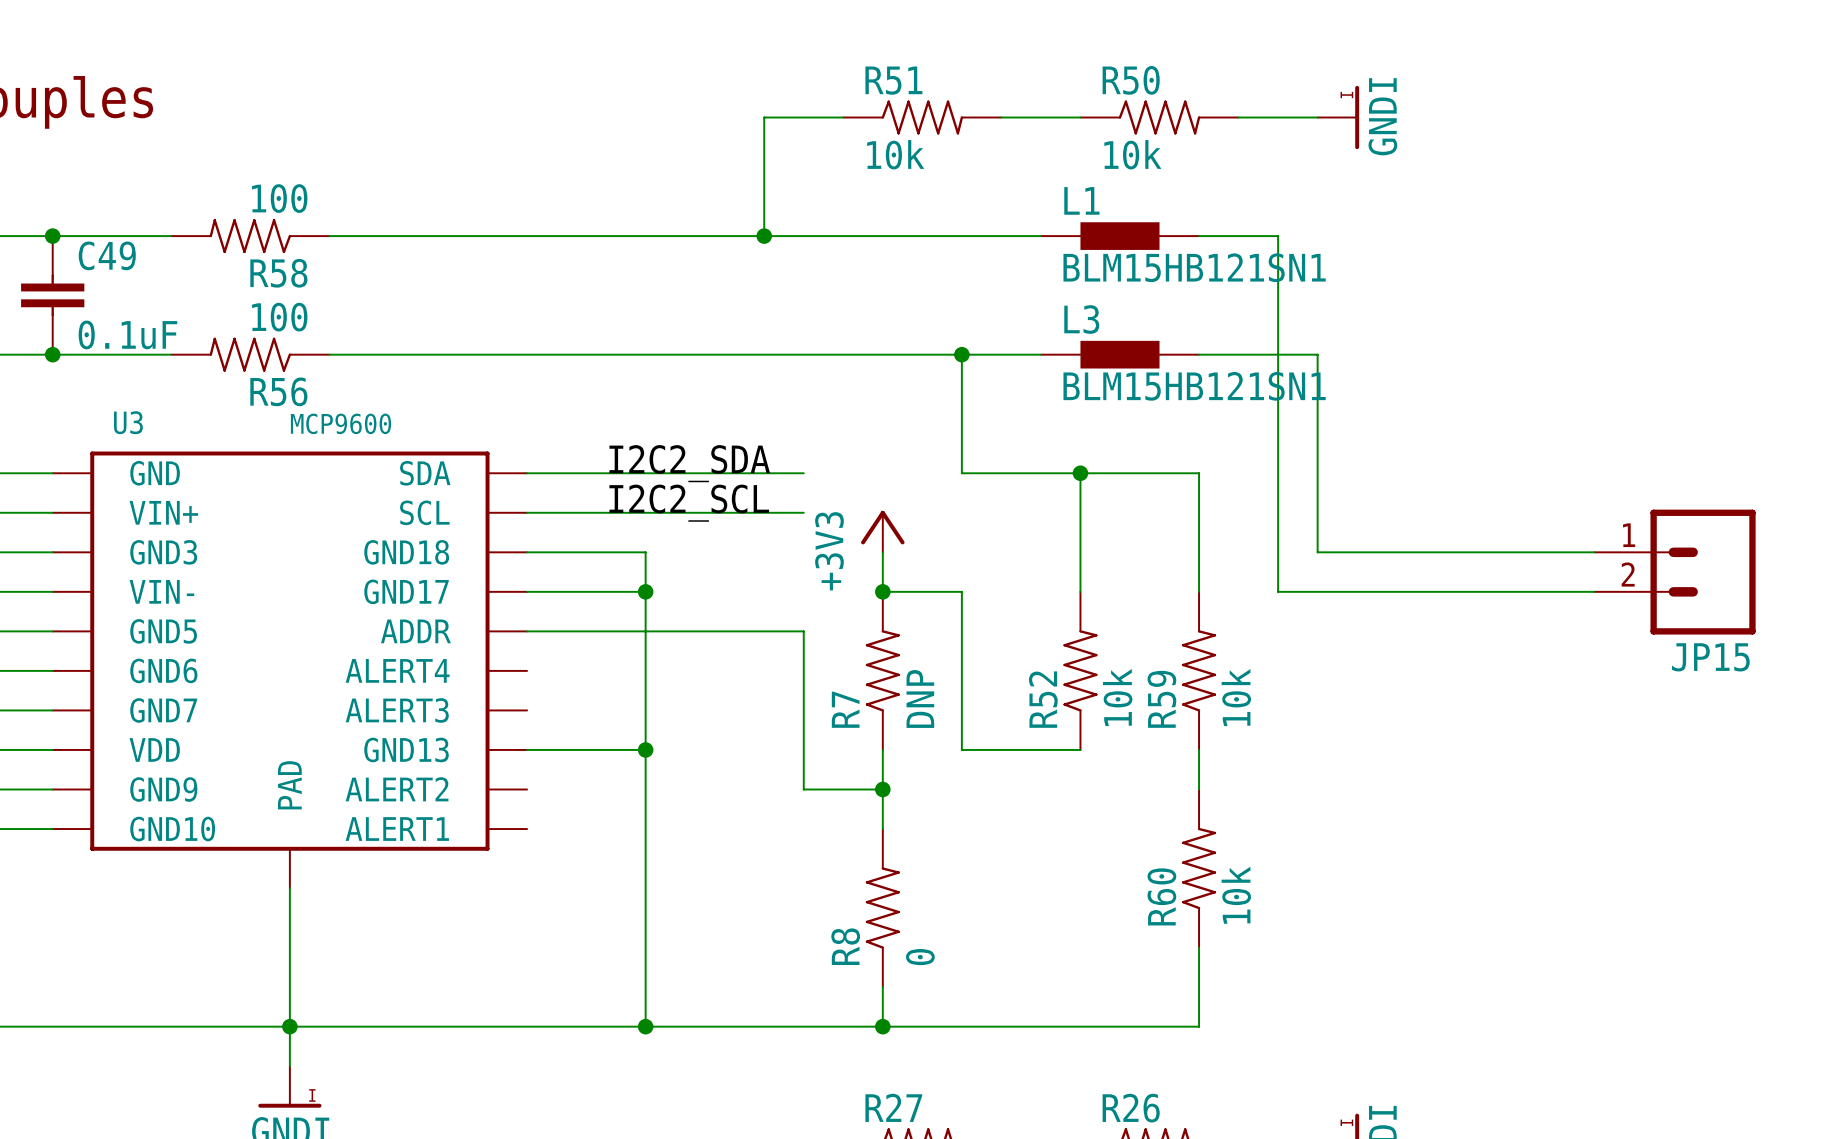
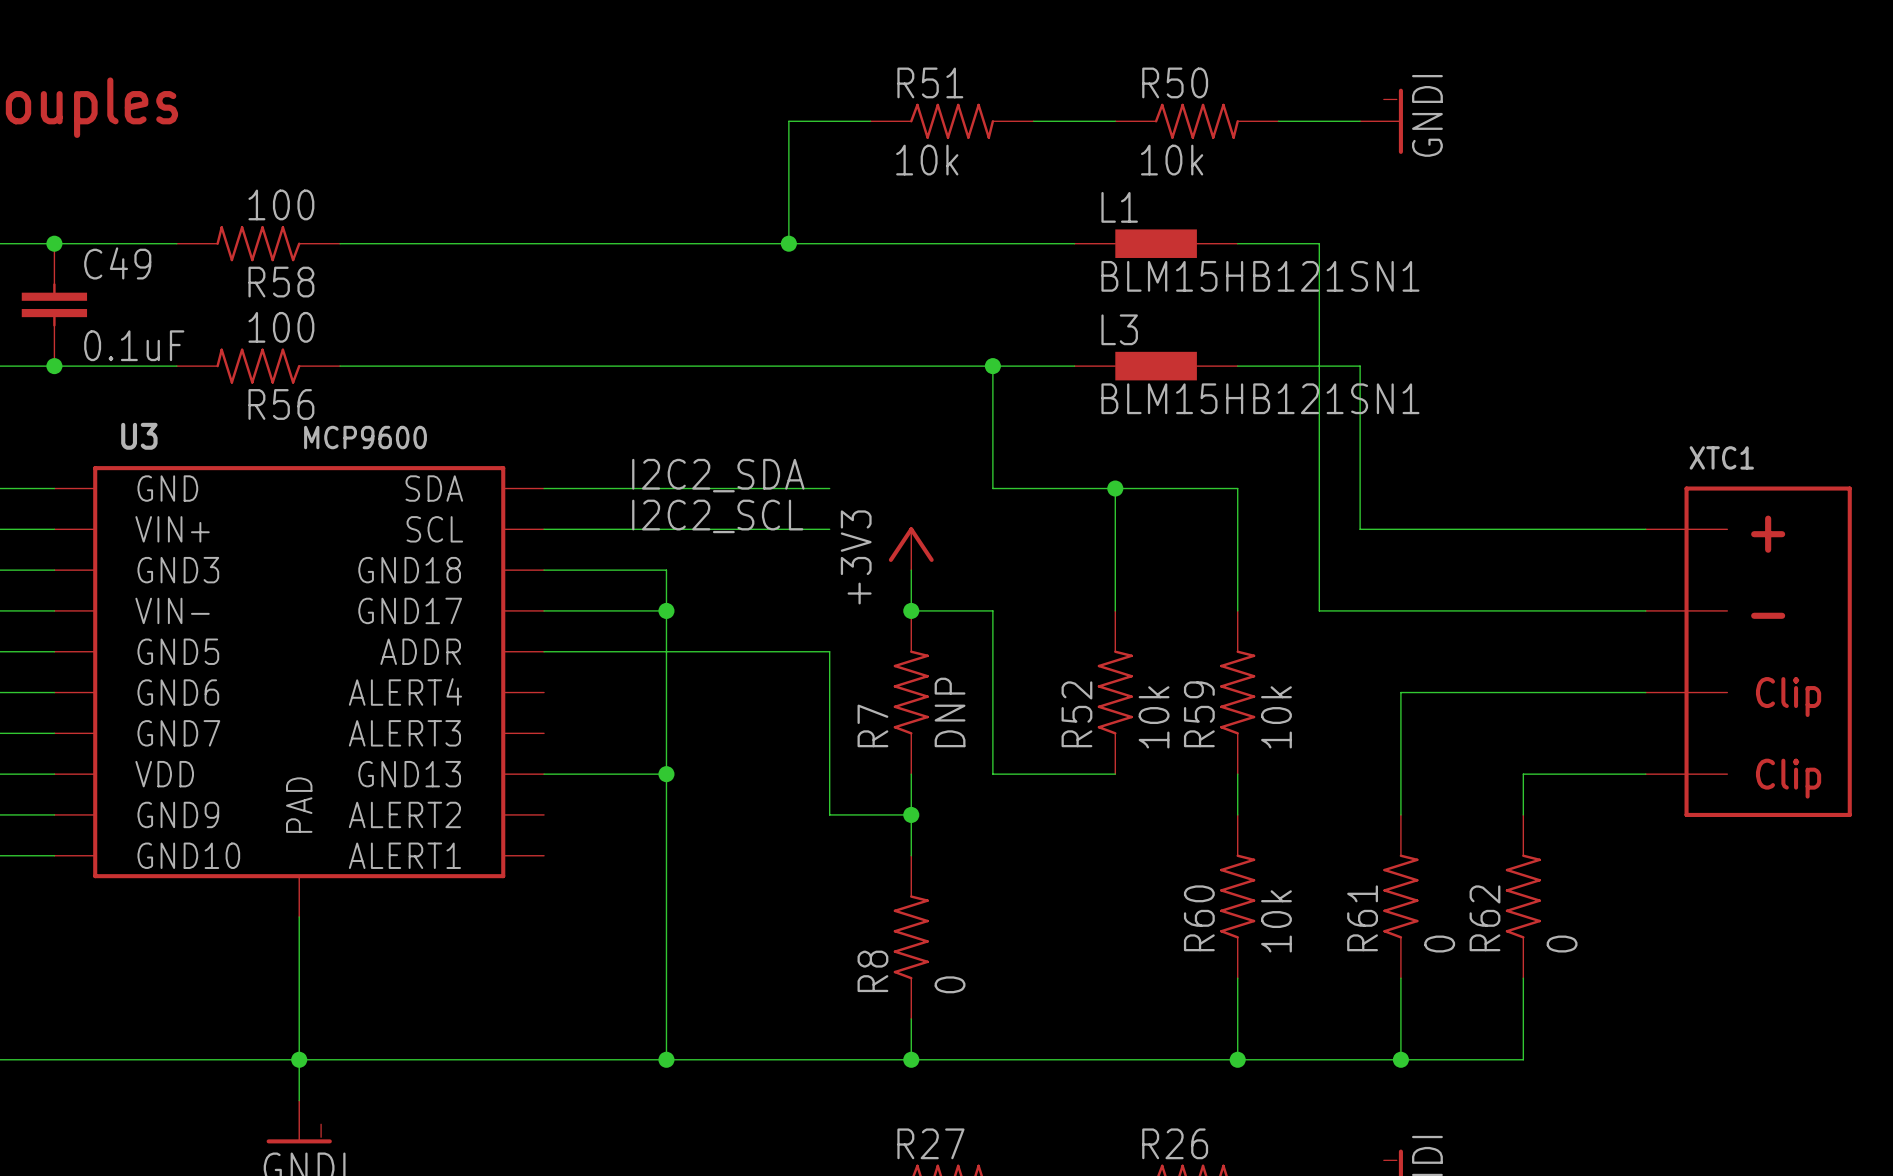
wire: (1317, 512) (1317, 552) (1594, 552) -> (1360, 529) (1645, 529)
JP15: (1674, 572) -> none
XTC1: none -> (1748, 651)
wire: none -> (1645, 692) (1400, 692) (1400, 814)
wire: none -> (1645, 774) (1523, 774) (1523, 814)
R61: none -> 0 (1400, 896)
R62: none -> 0 (1523, 896)
wire: none -> (1400, 978) (1400, 1059)
wire: none -> (1523, 978) (1523, 1059) (1237, 1059)
junction: none -> (1237, 1059)
junction: none -> (1400, 1059)

